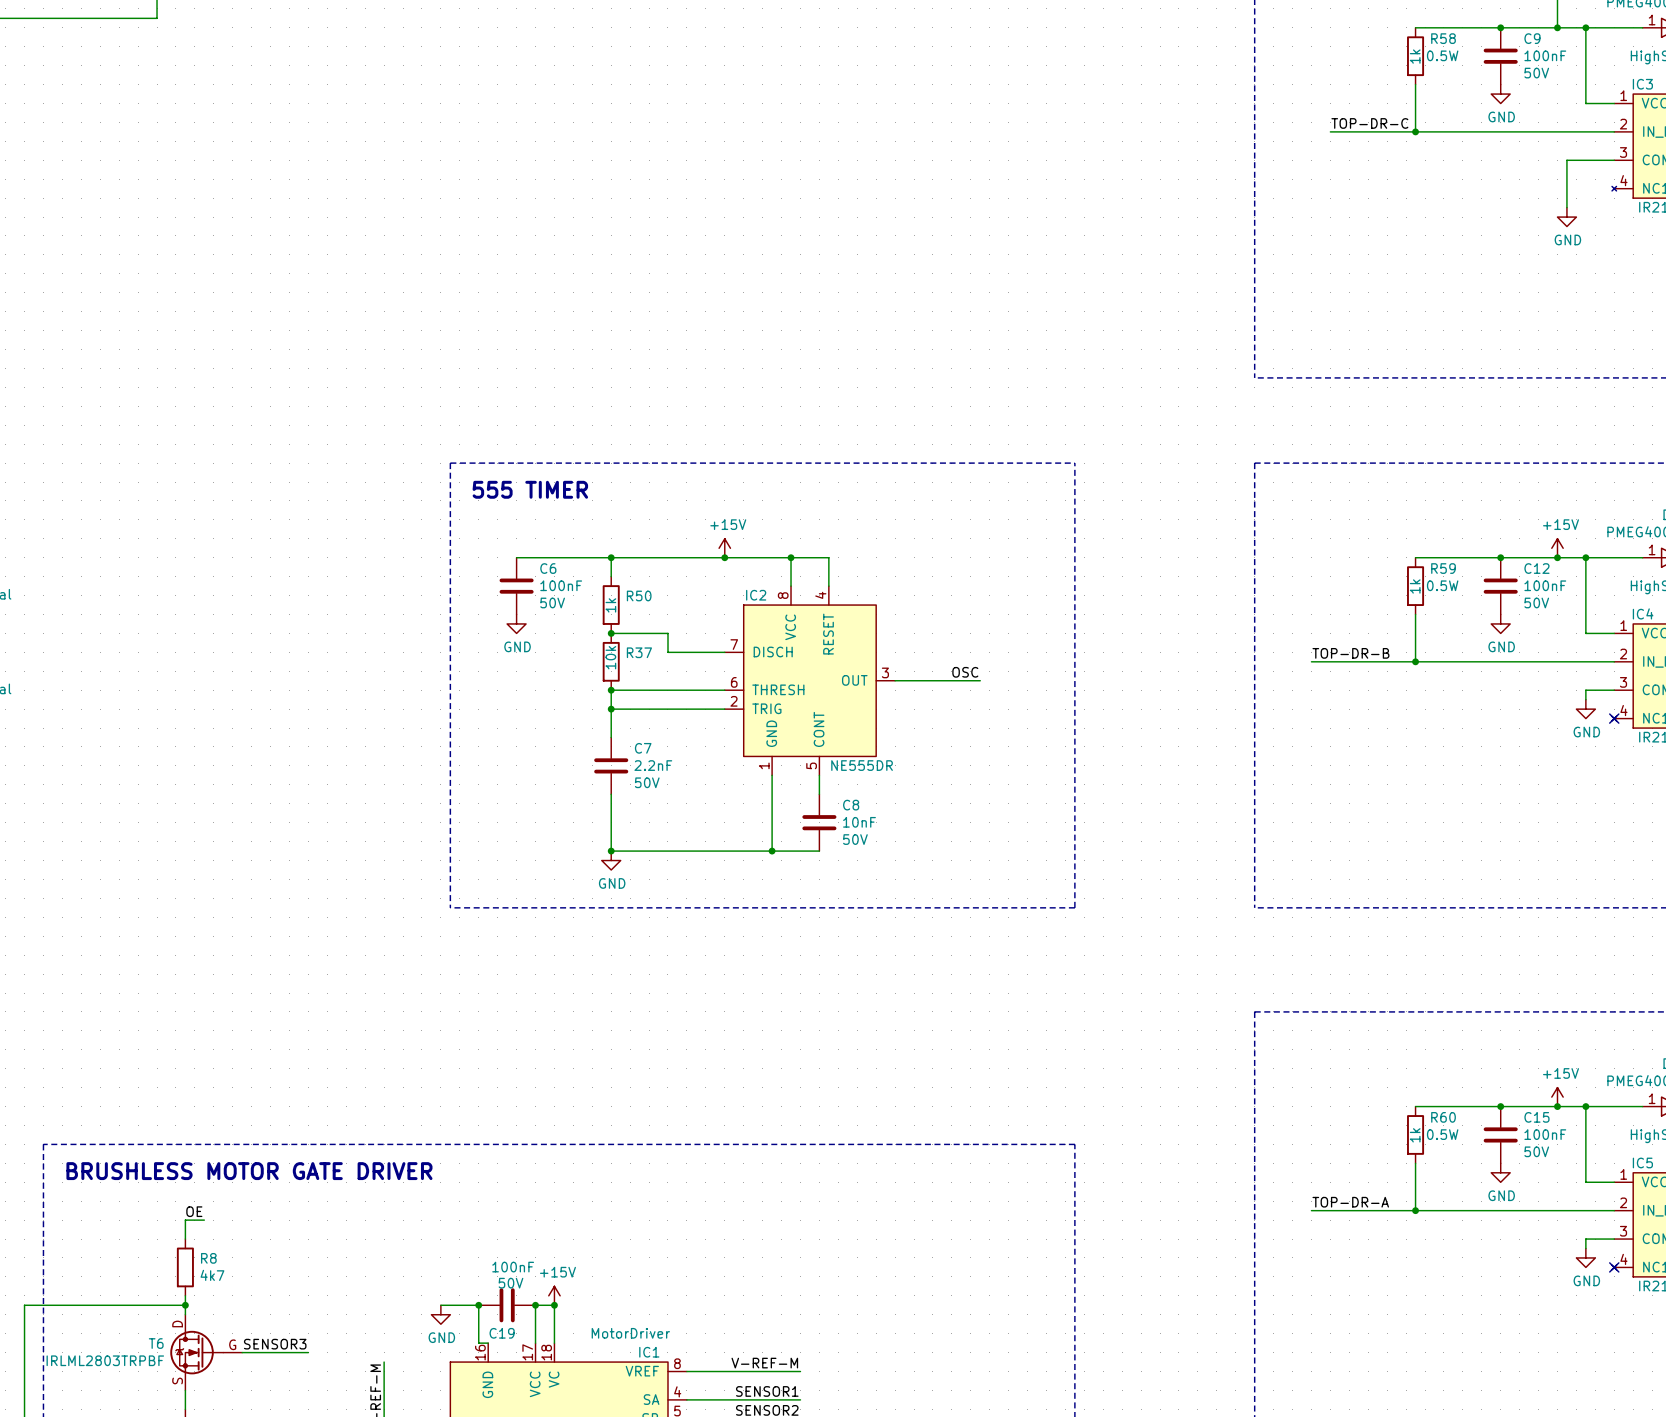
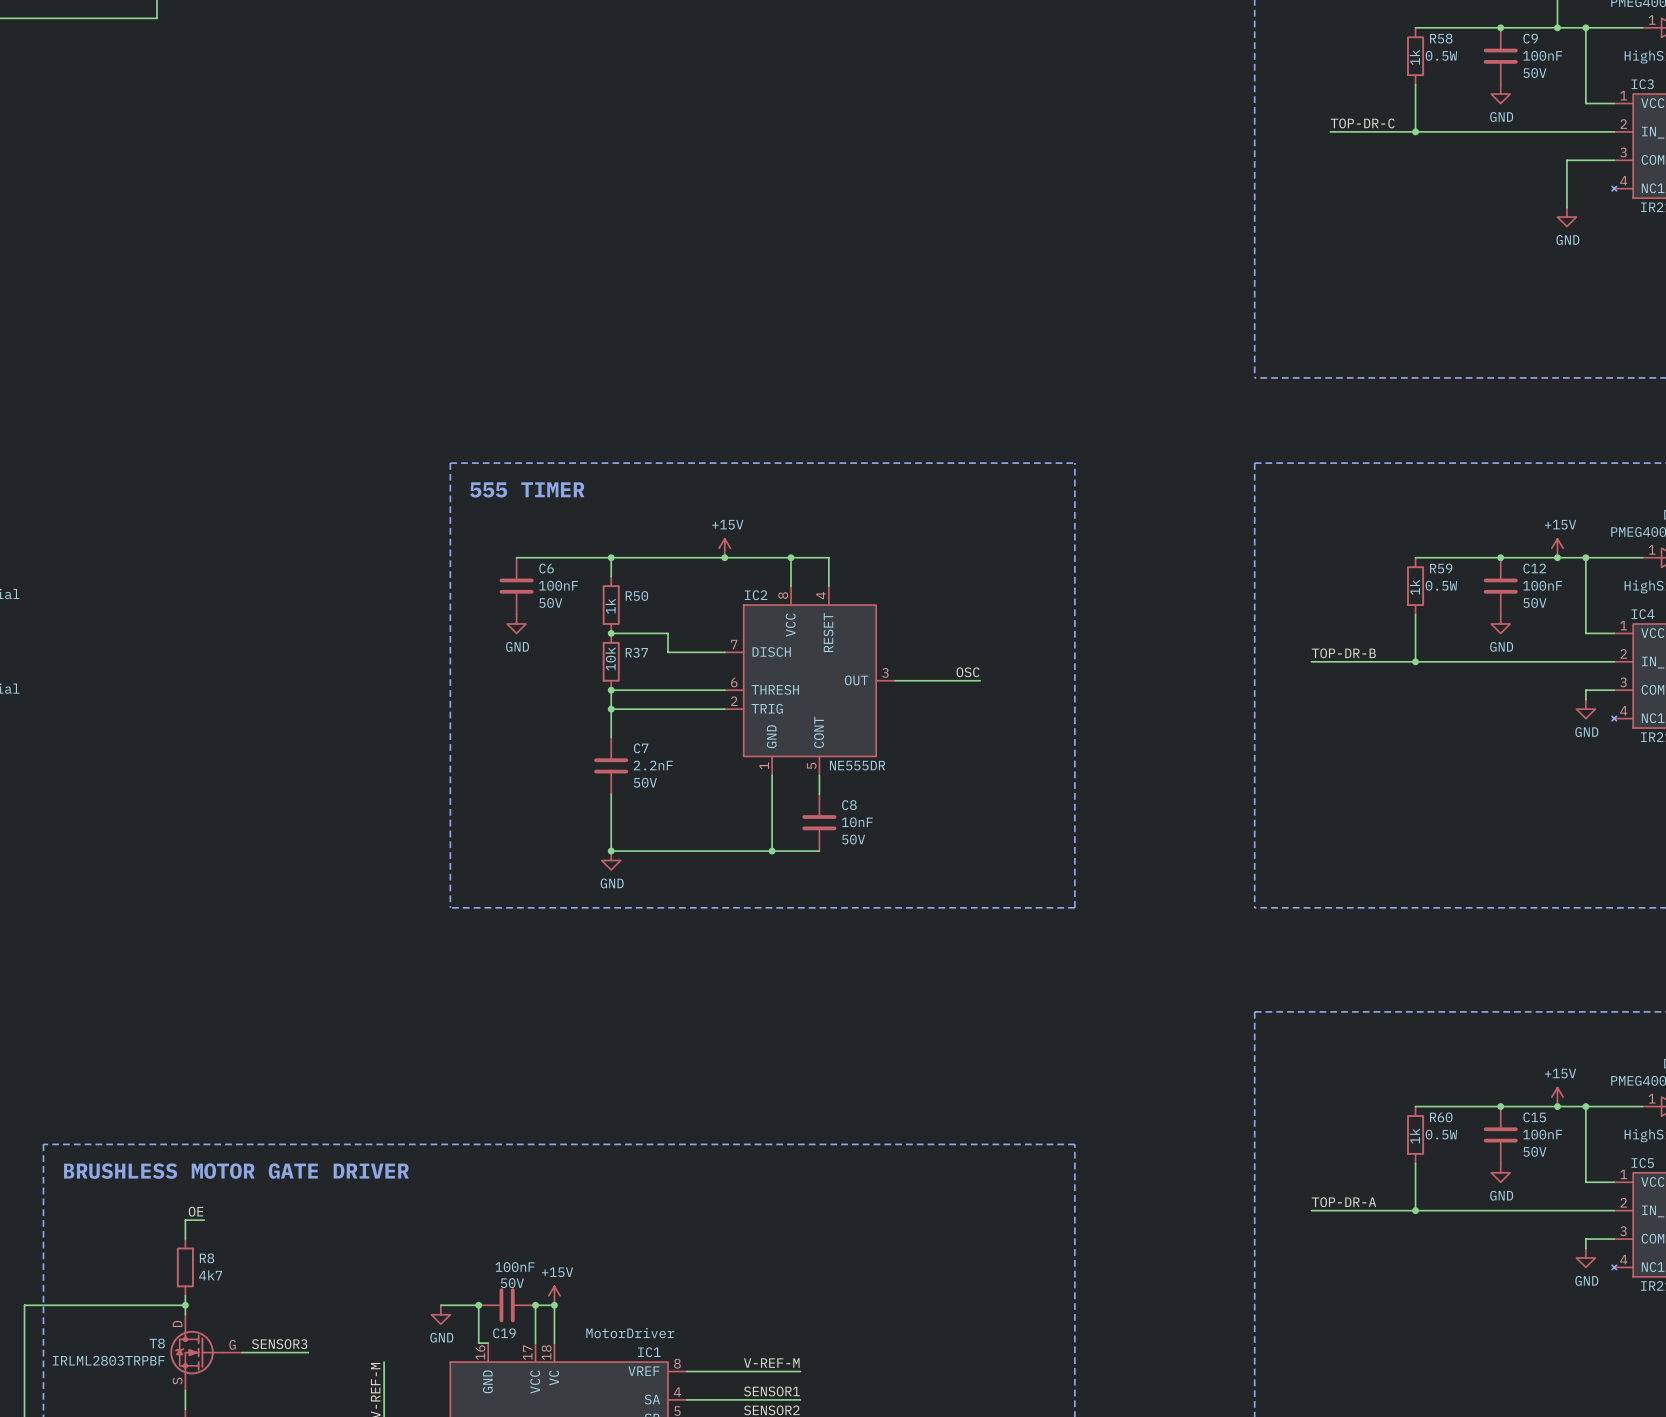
no-connect mark: (1614, 718) -> none
no-connect mark: (1614, 1267) -> none
T6 name: T6 (156, 1343) -> T8 (157, 1343)

